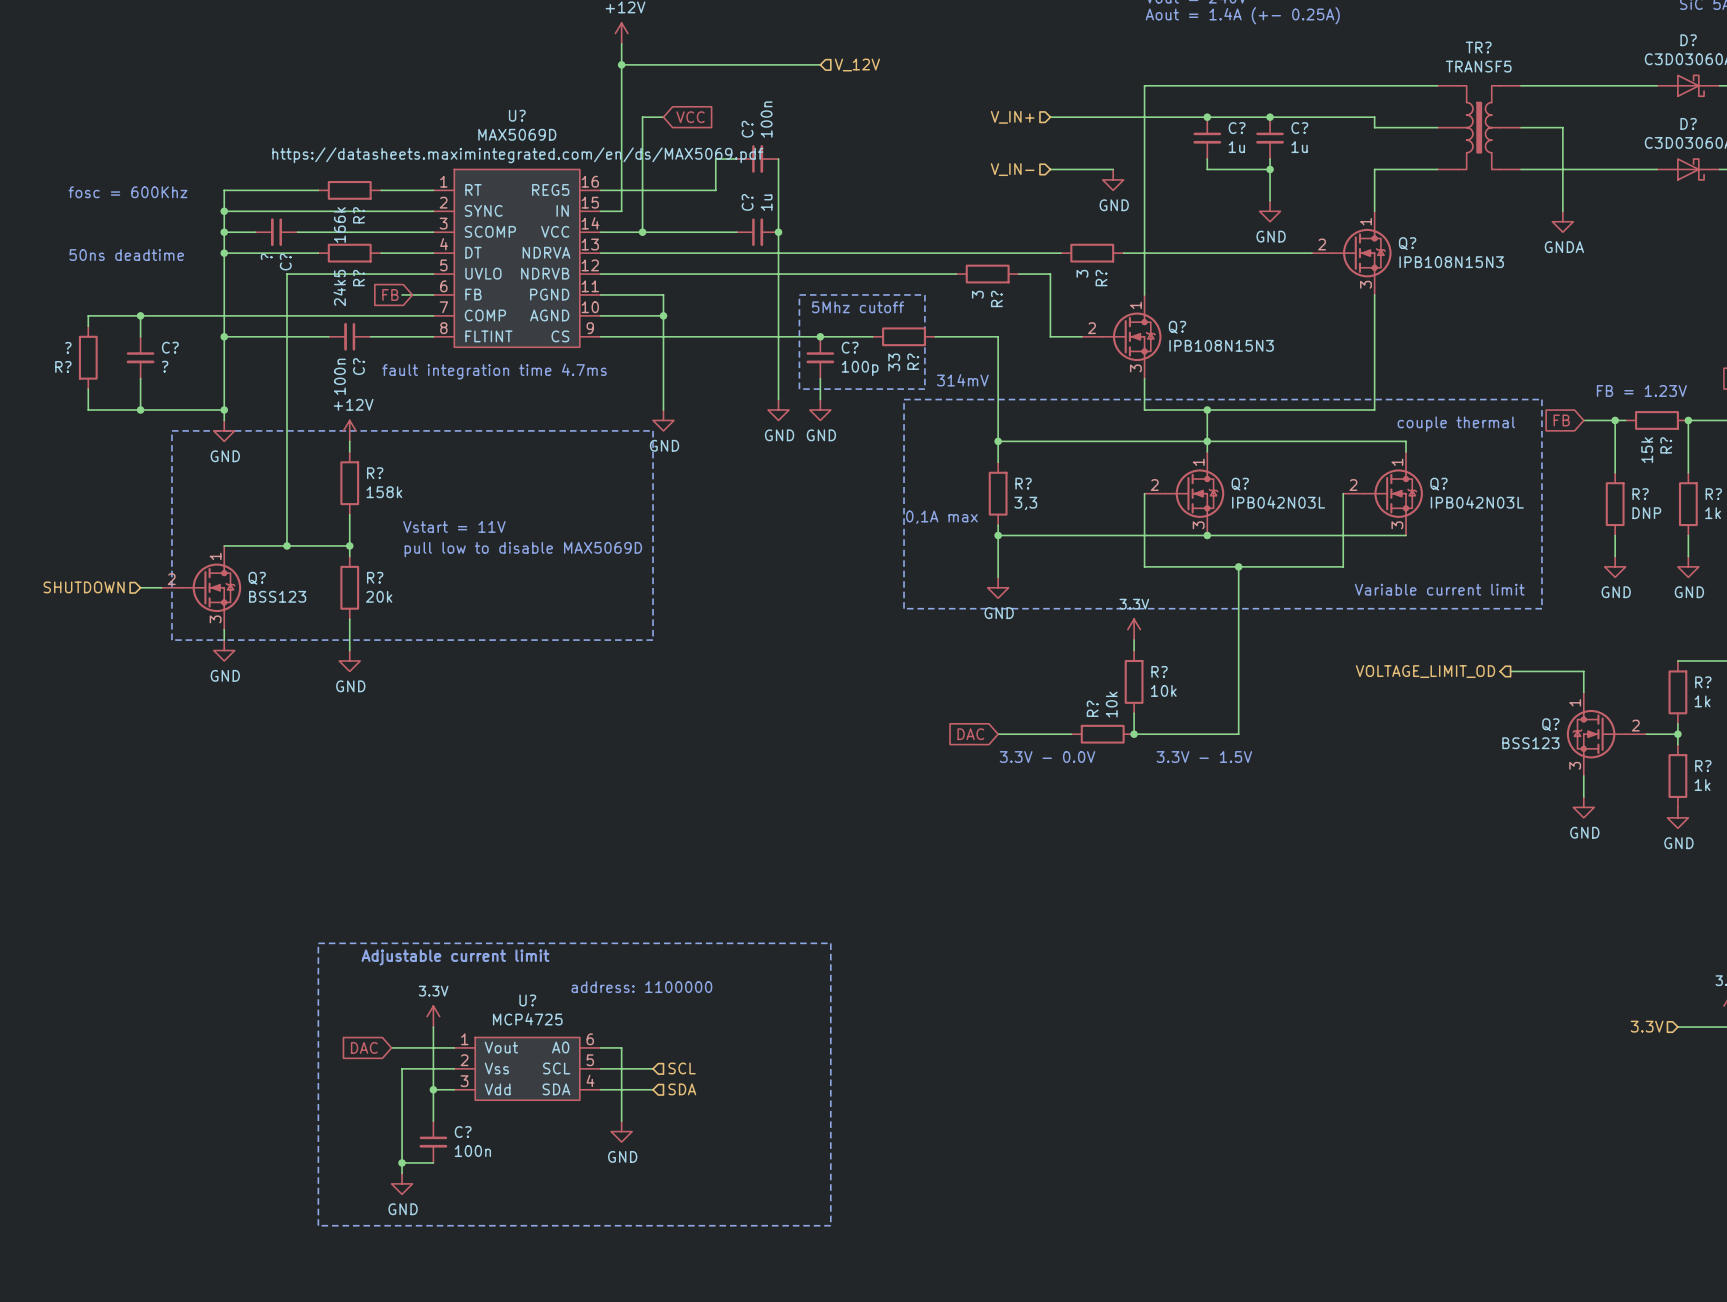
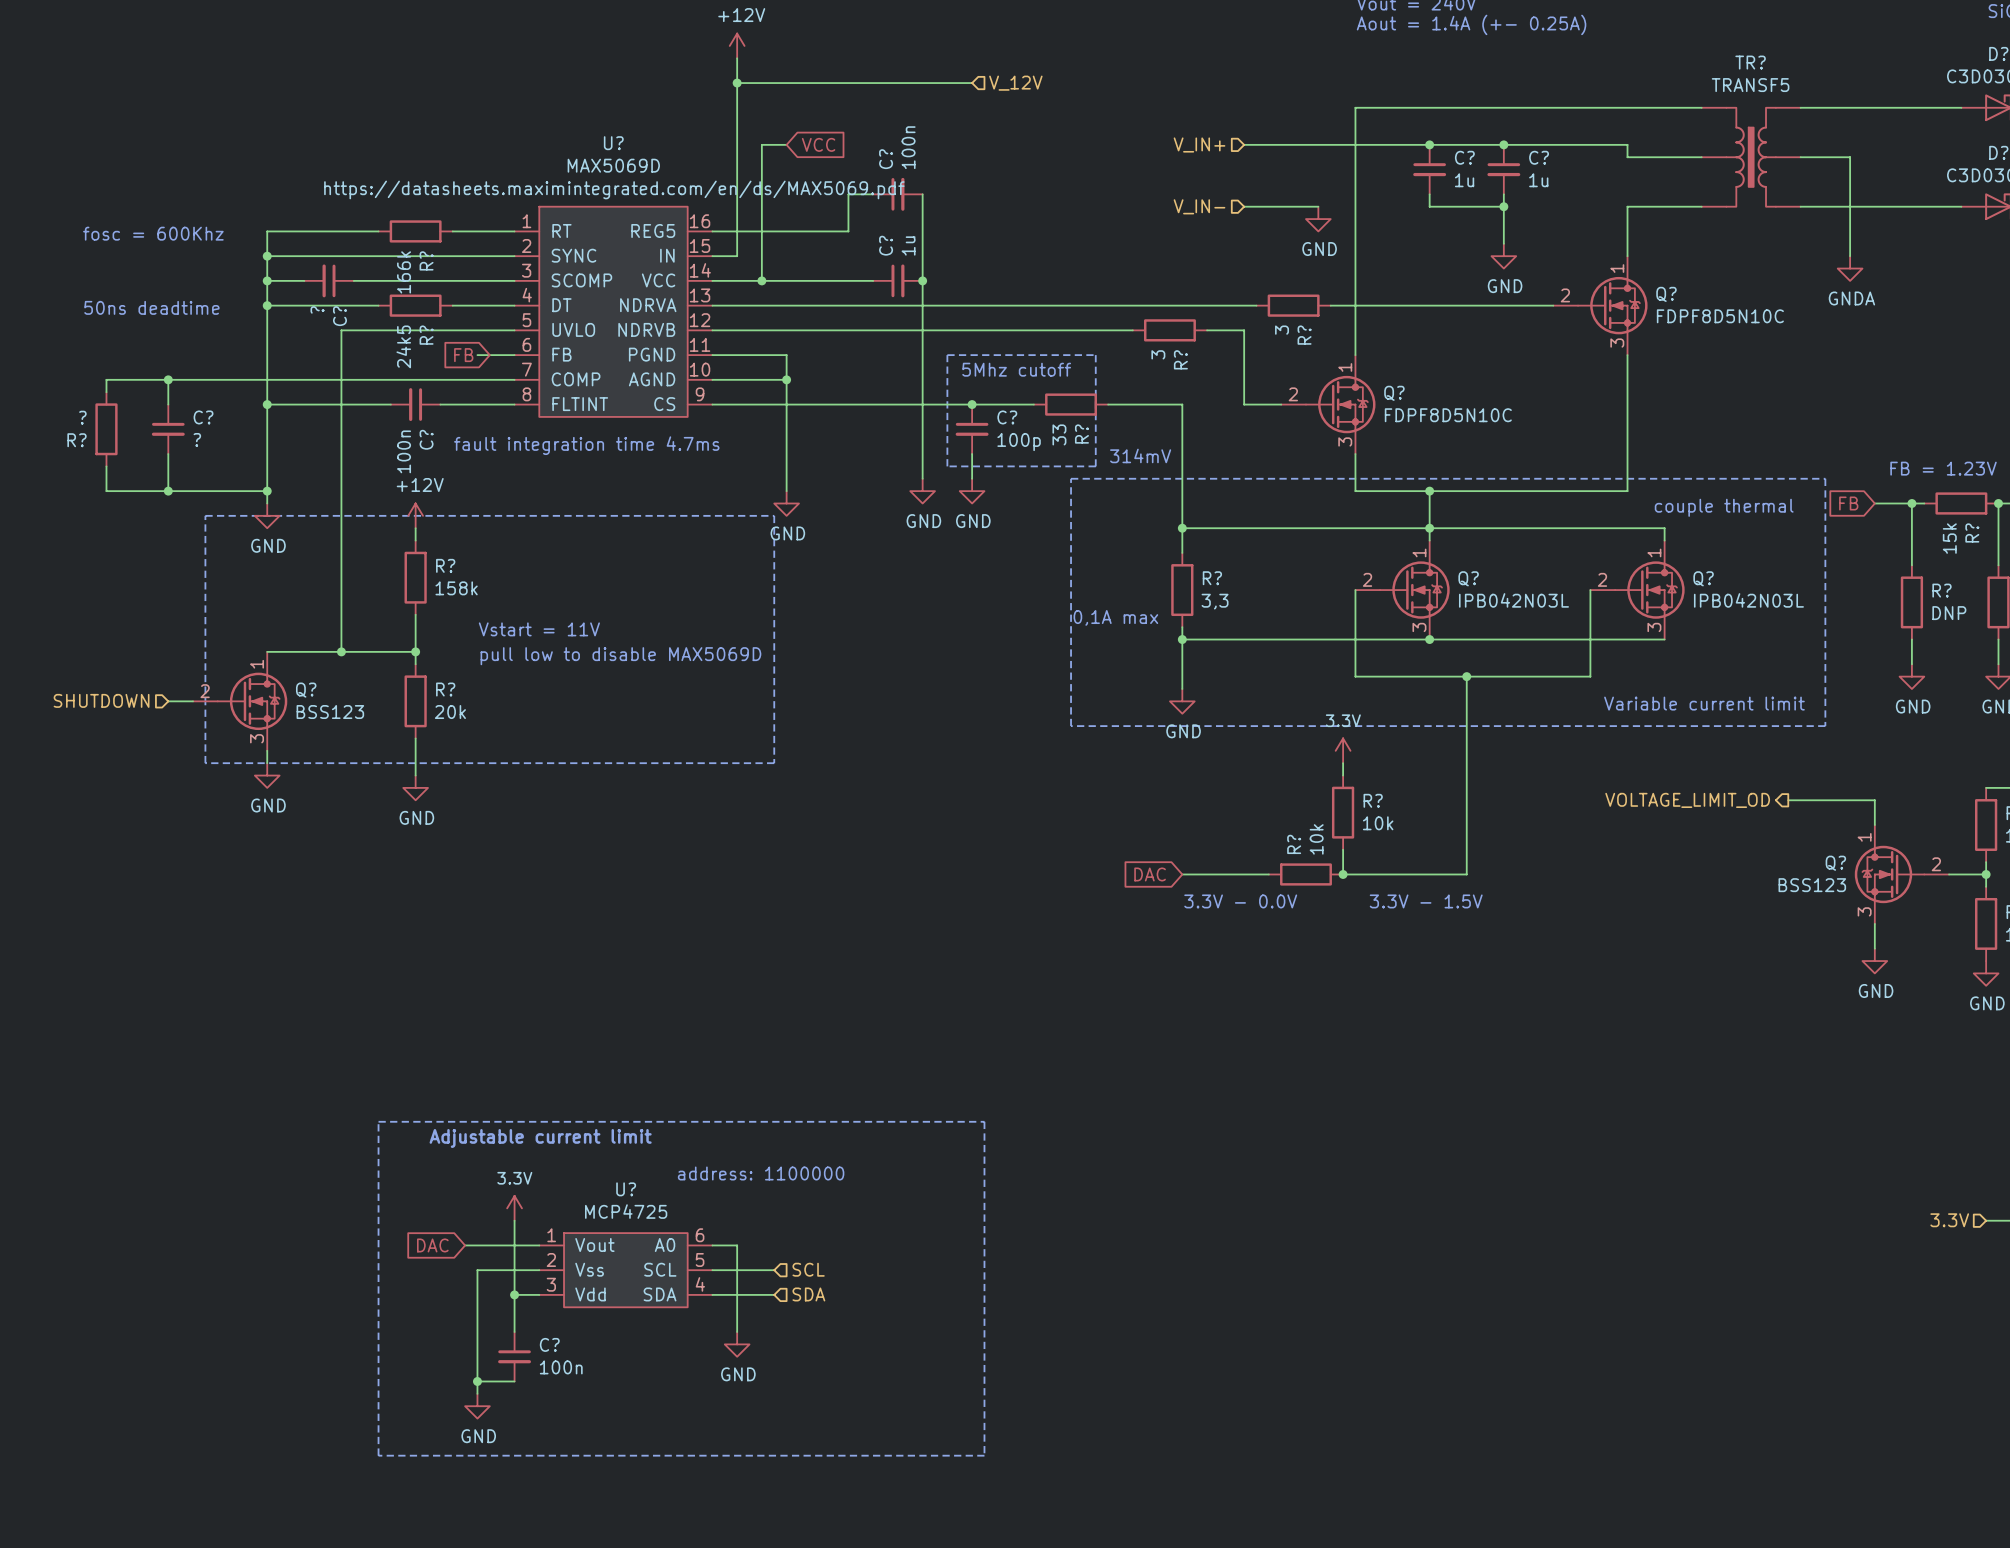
Q? value: IPB108N15N3 (1451, 262) -> FDPF8D5N10C (1720, 316)
Q? value: IPB108N15N3 (1221, 345) -> FDPF8D5N10C (1448, 415)

